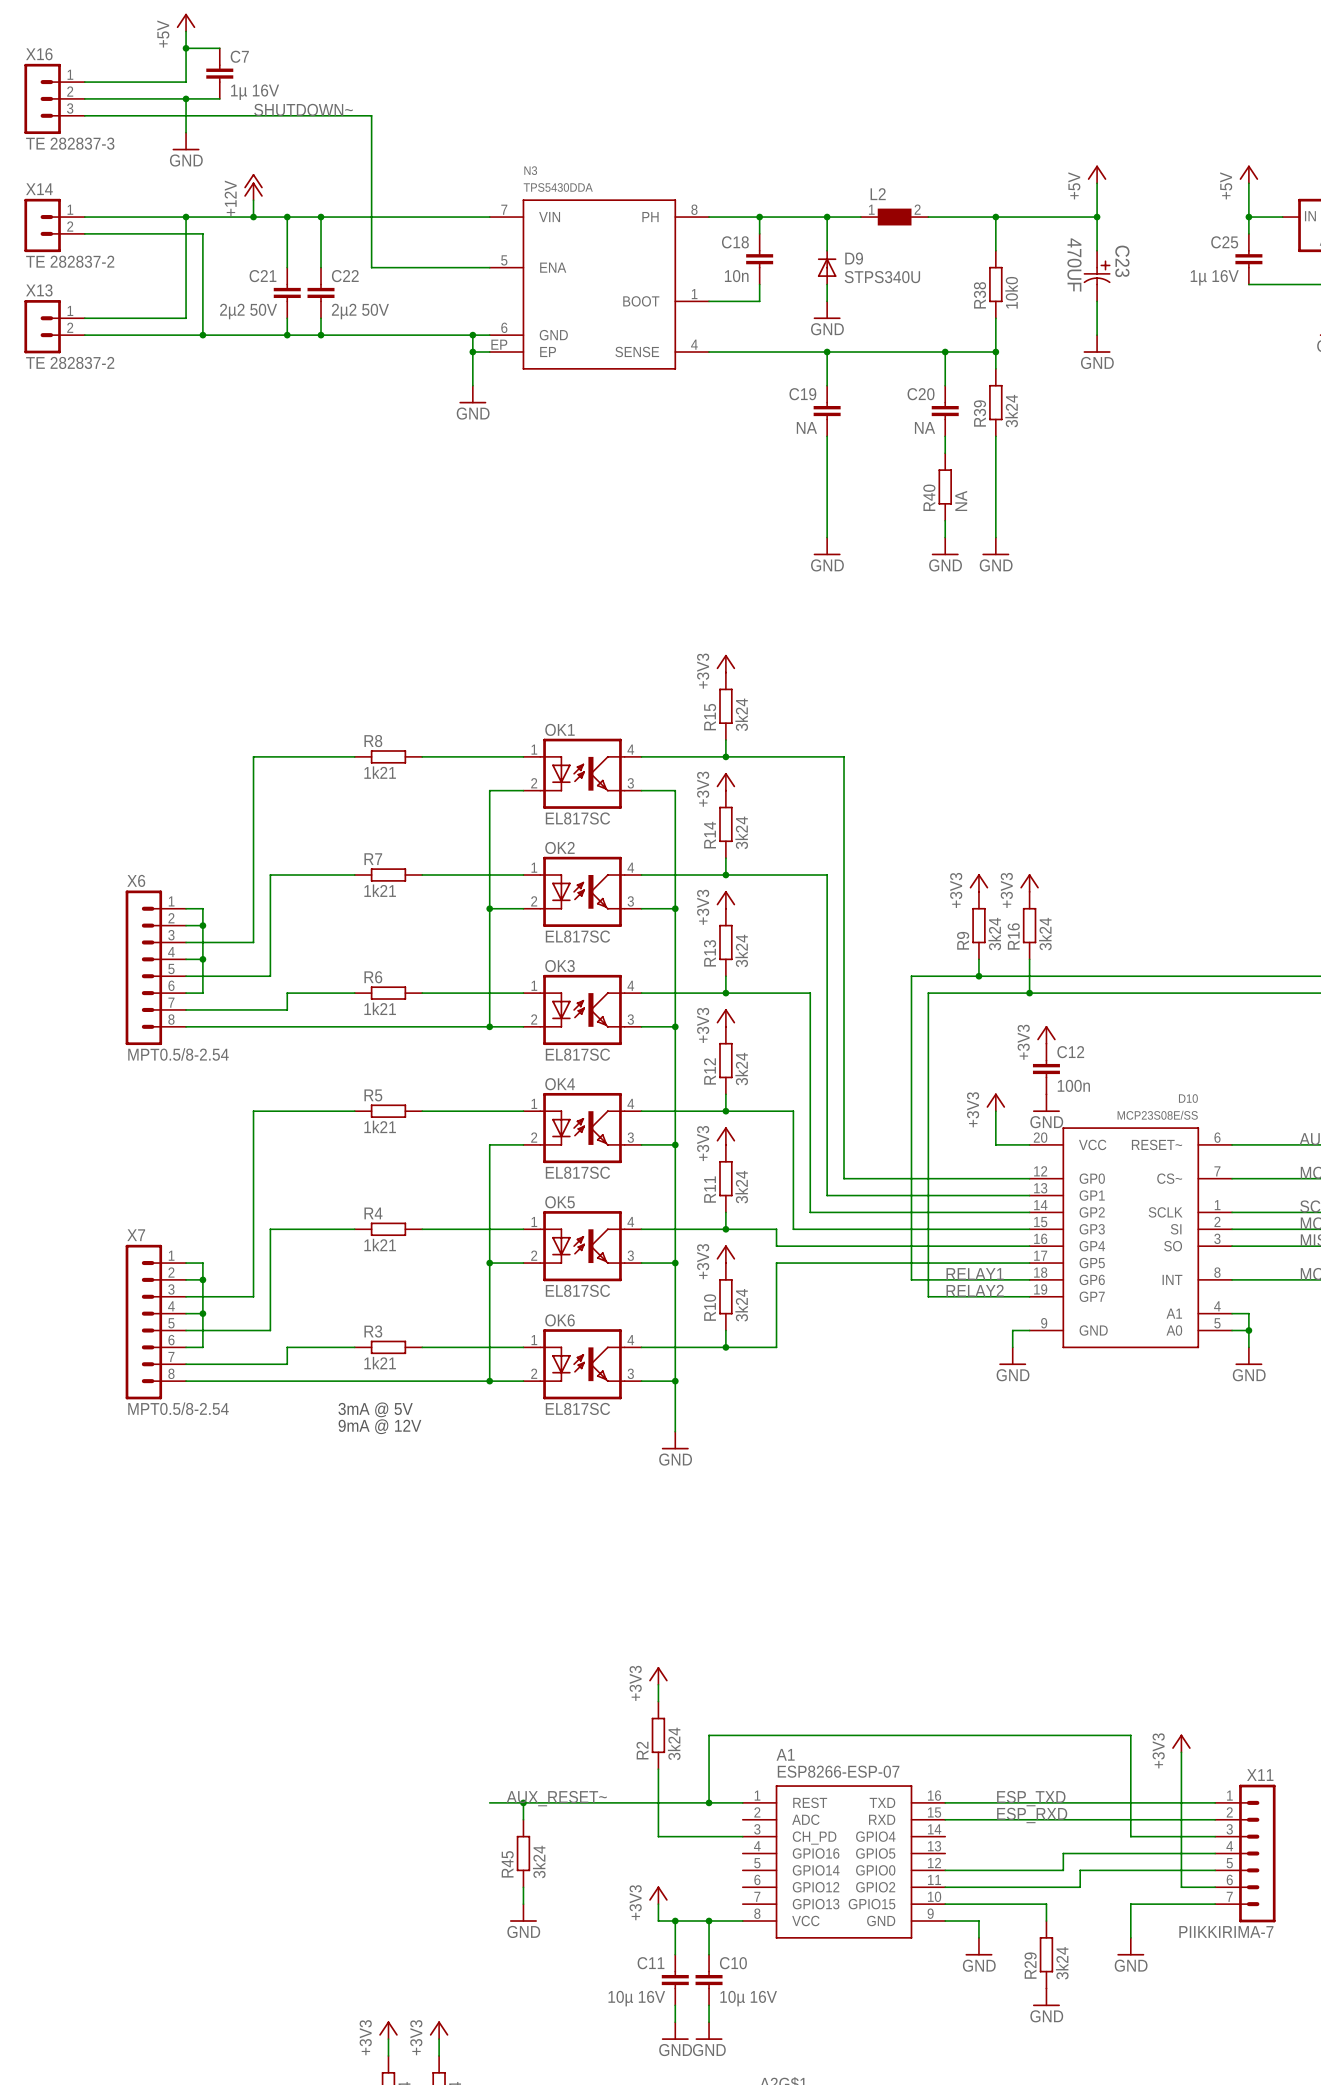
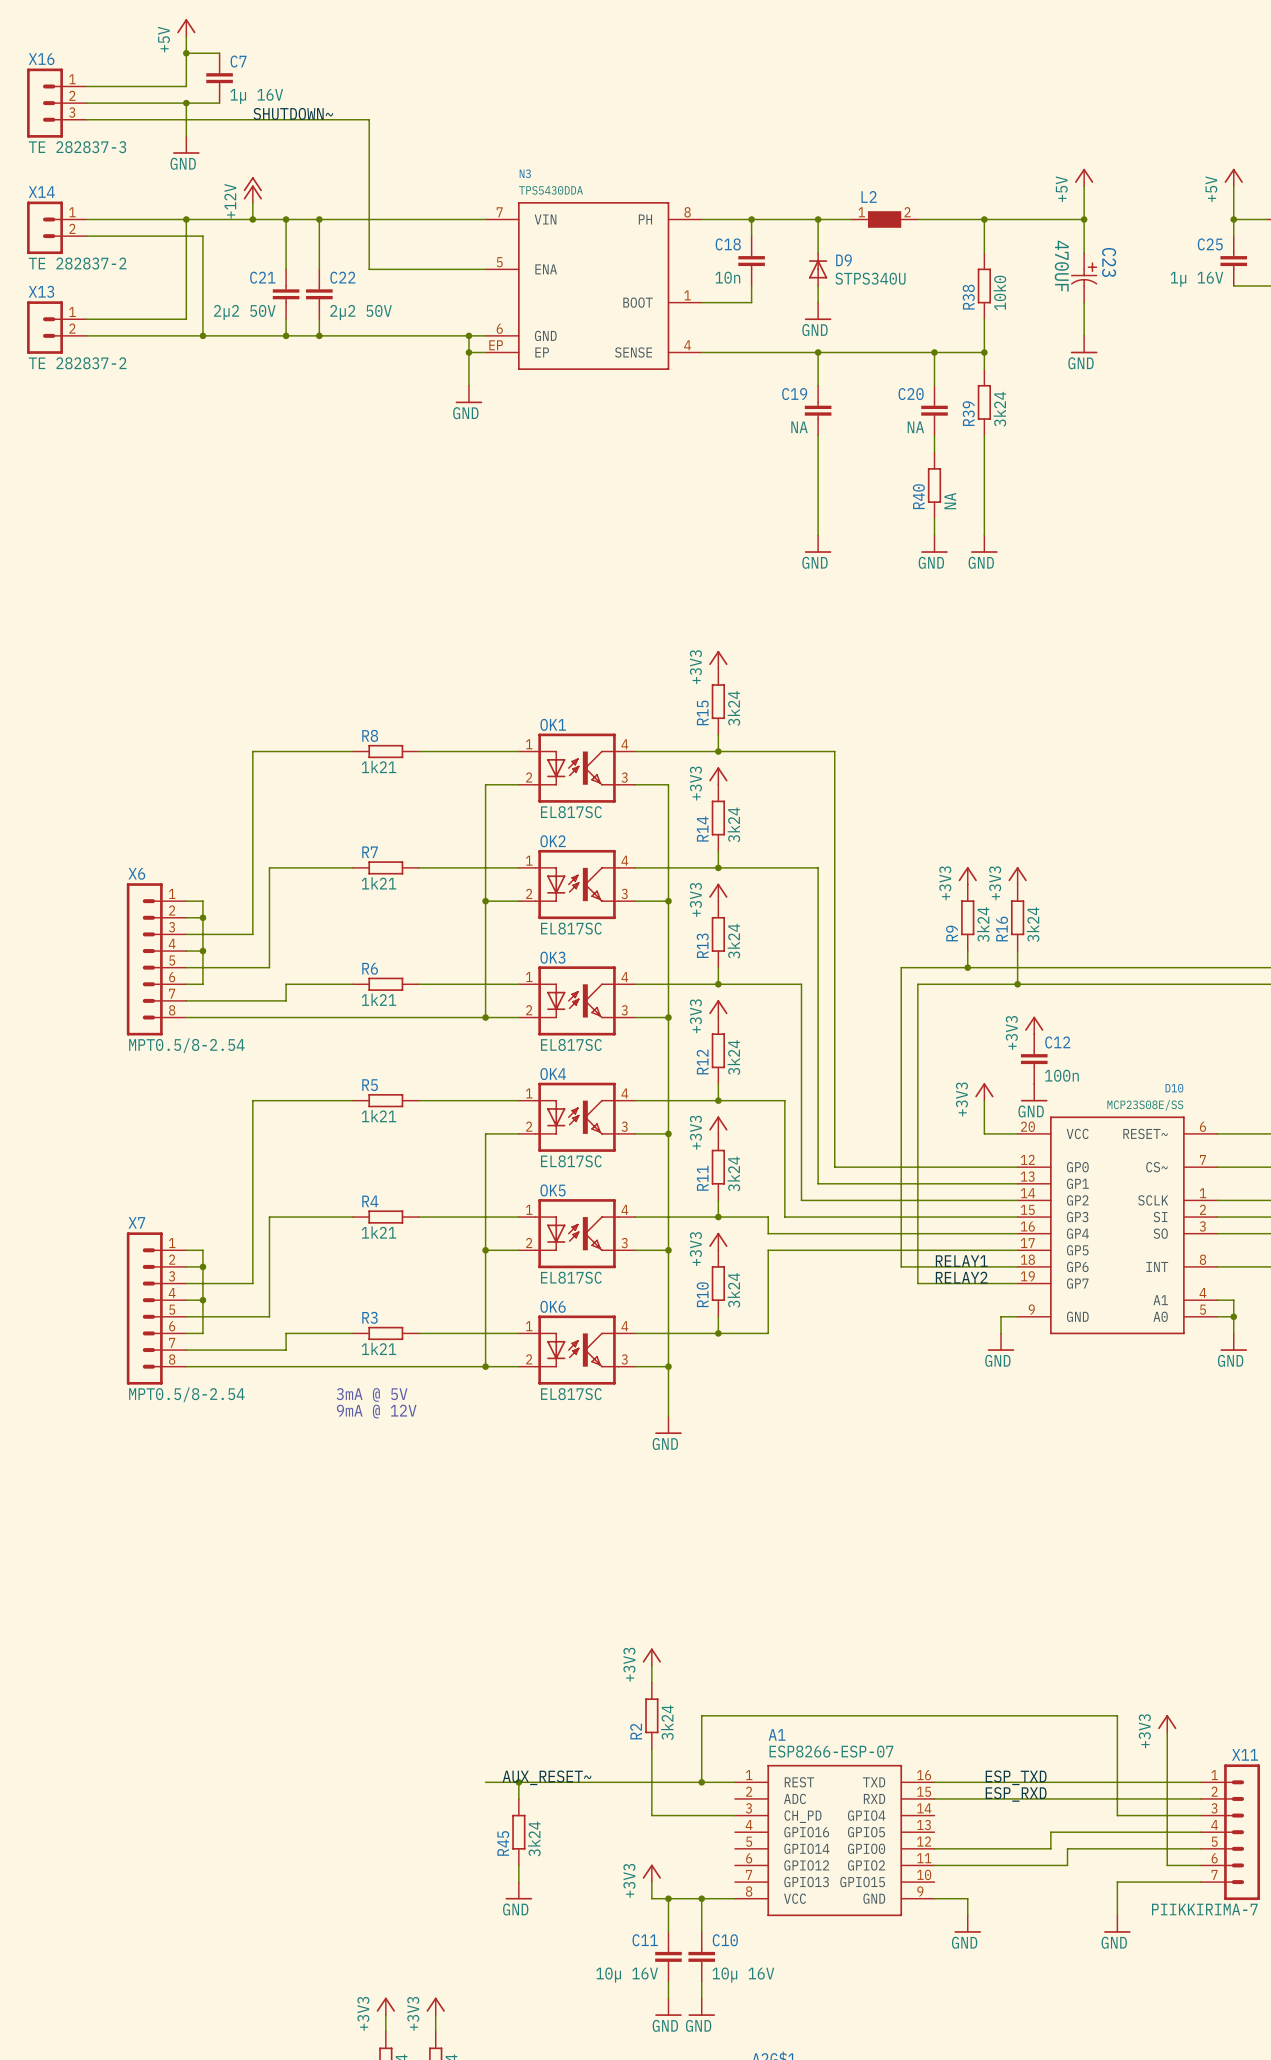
wire: (945, 1904) (1046, 1904) (1046, 1921) -> none
R29: 3k24 (1046, 1954) -> none
power symbol: GND (1046, 1997) -> none

